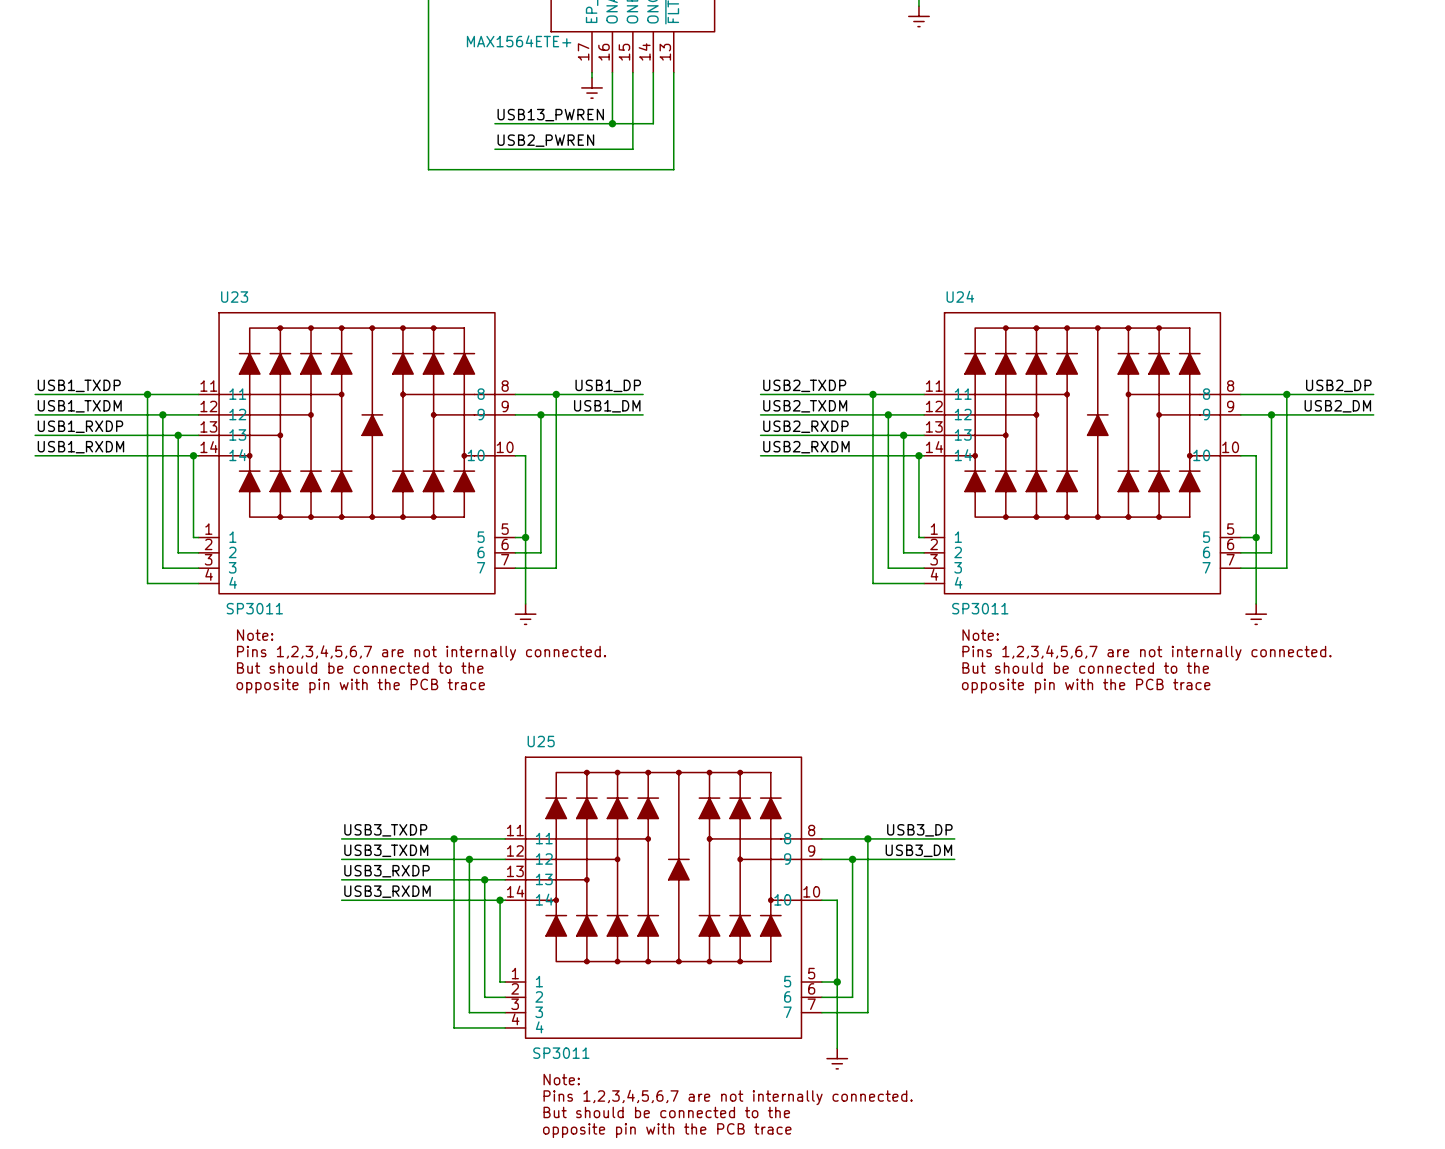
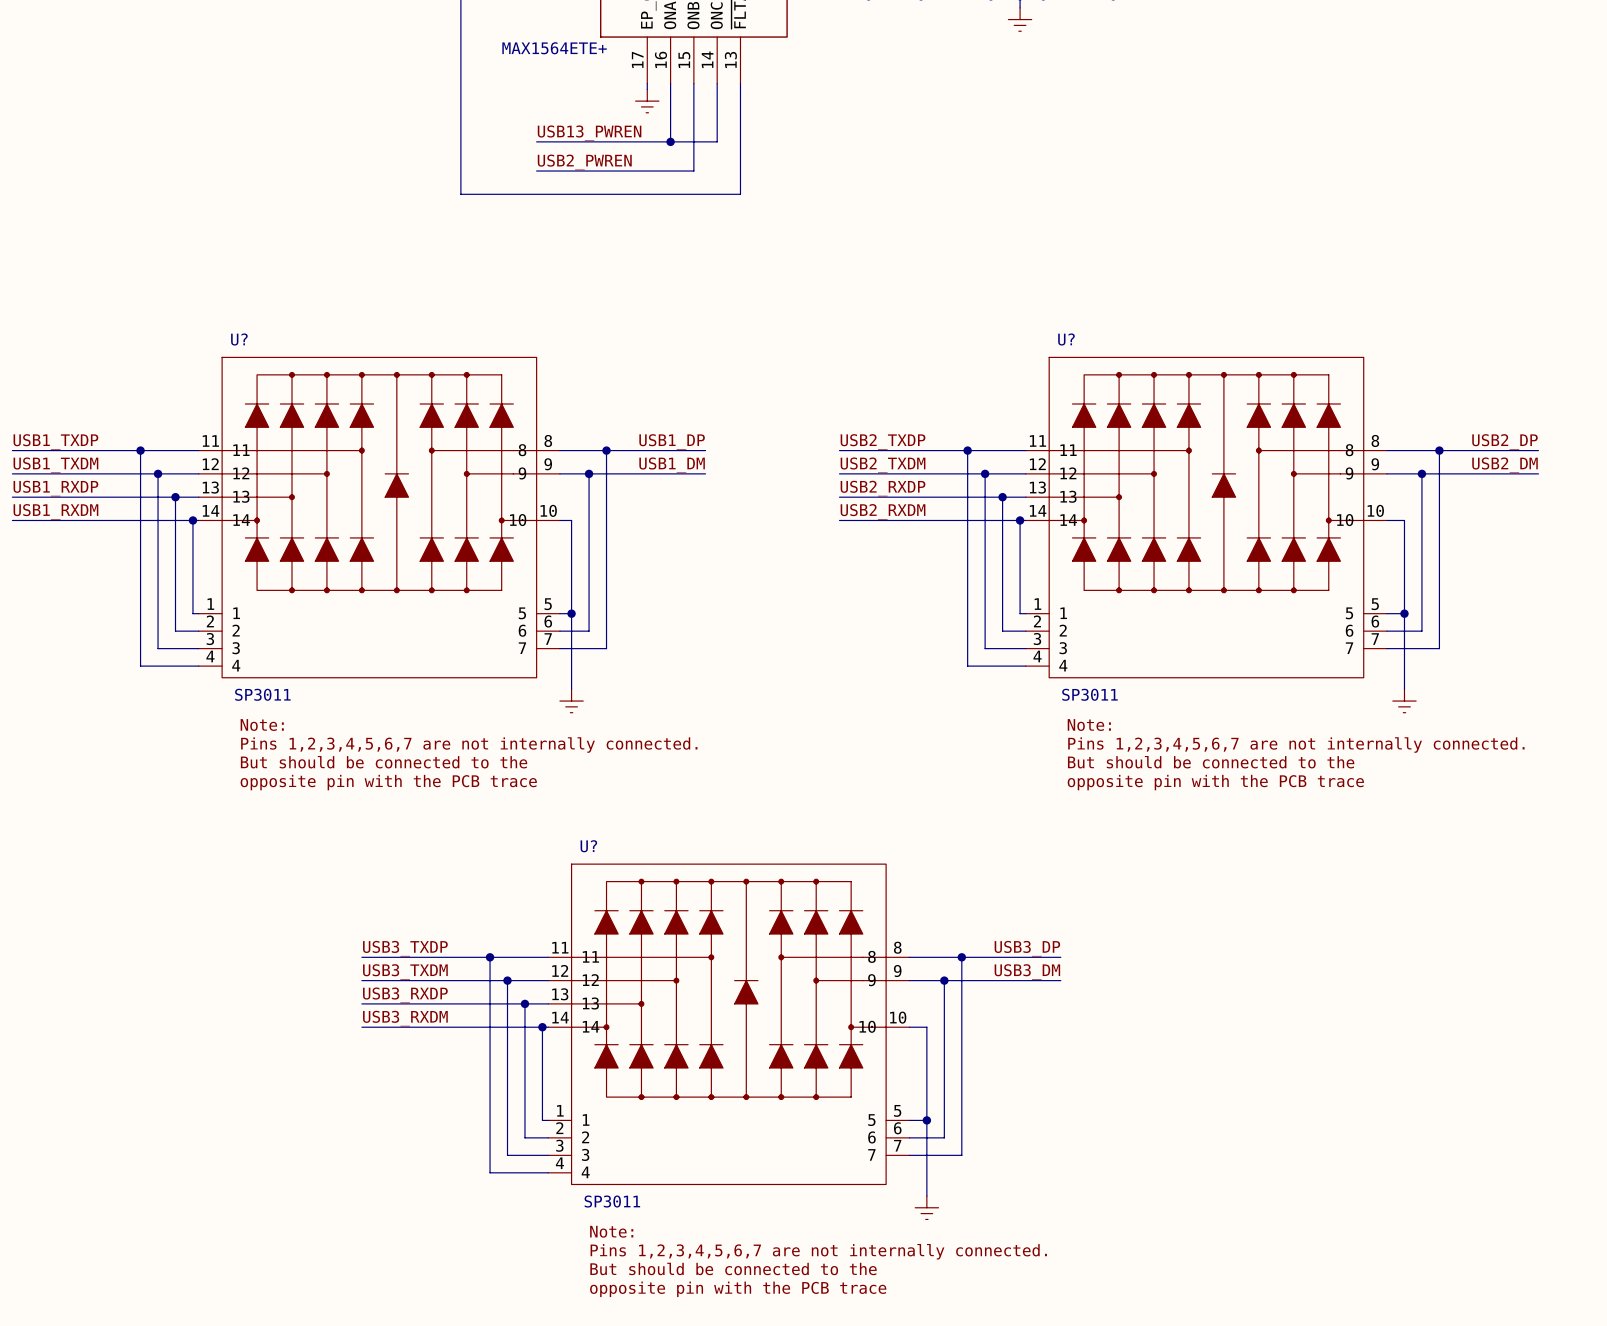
U24 name: U24 (960, 296) -> U? (1066, 339)
U23 name: U23 (234, 297) -> U? (239, 339)
U25 name: U25 (541, 741) -> U? (588, 846)

